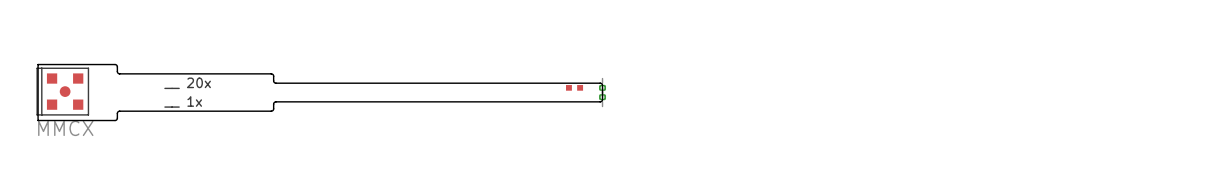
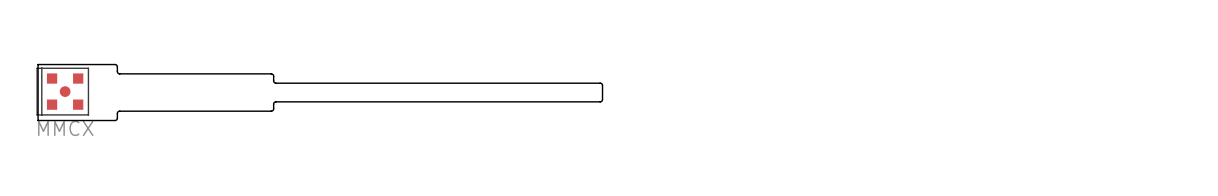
text: __ 20x (187, 83) -> none
part: (574, 87) -> none
part: (602, 87) -> none
part: (602, 97) -> none
text: __ 1x (183, 101) -> none

